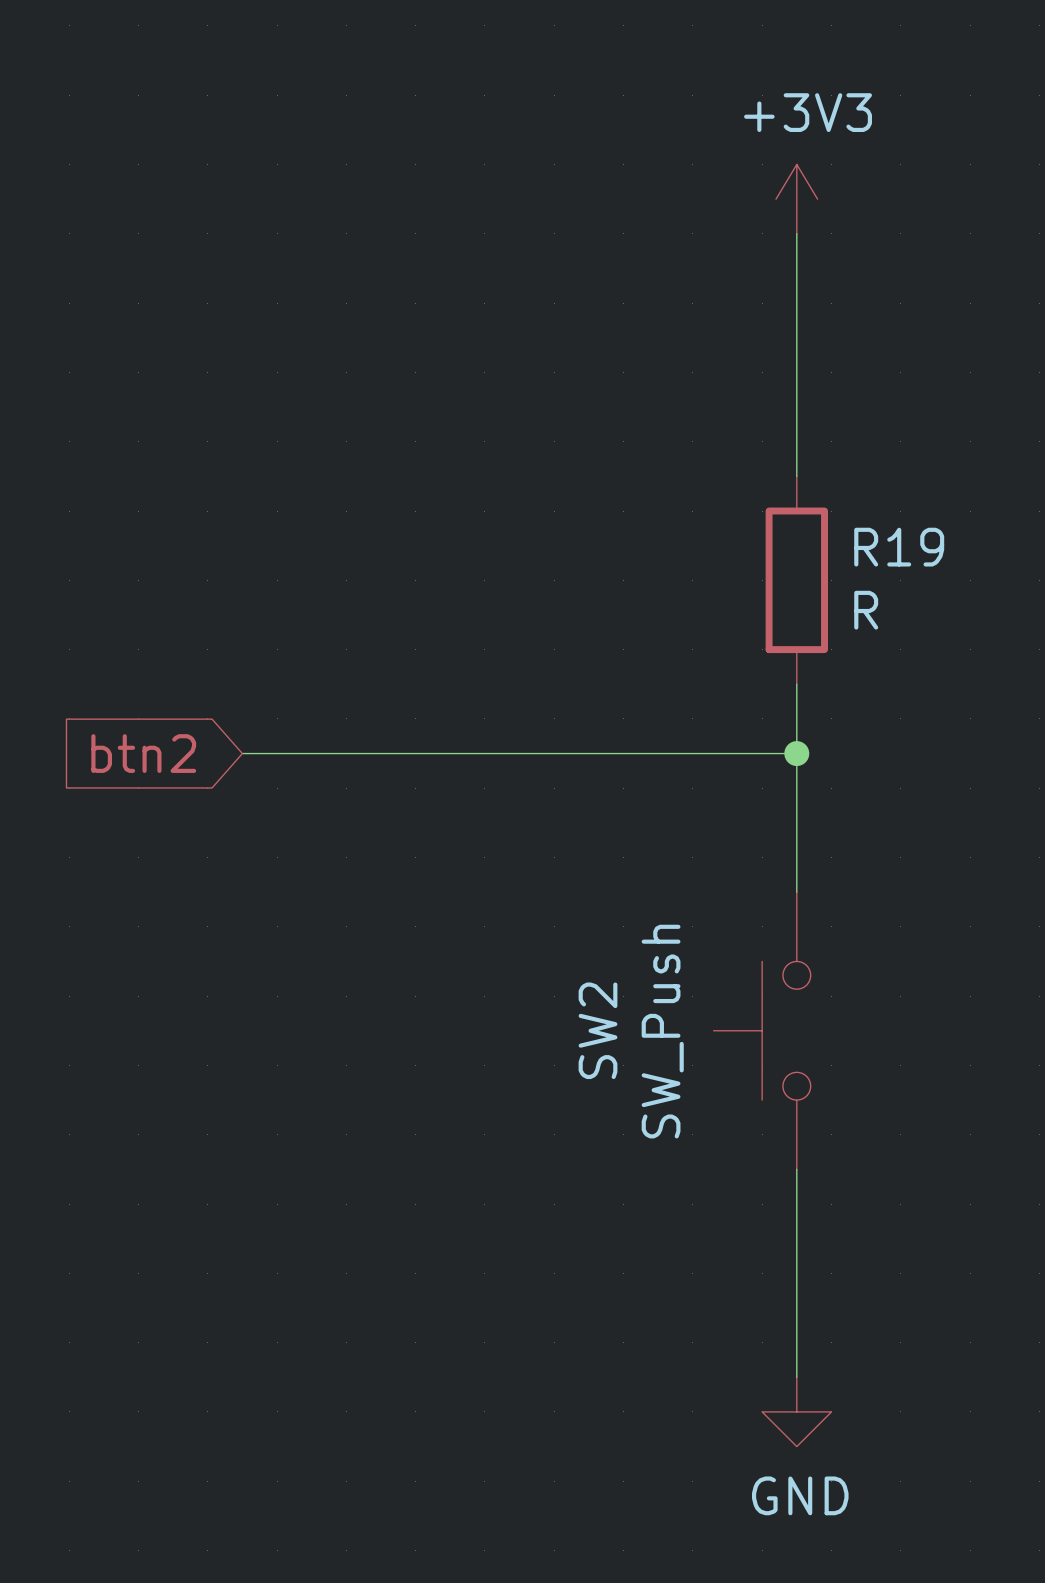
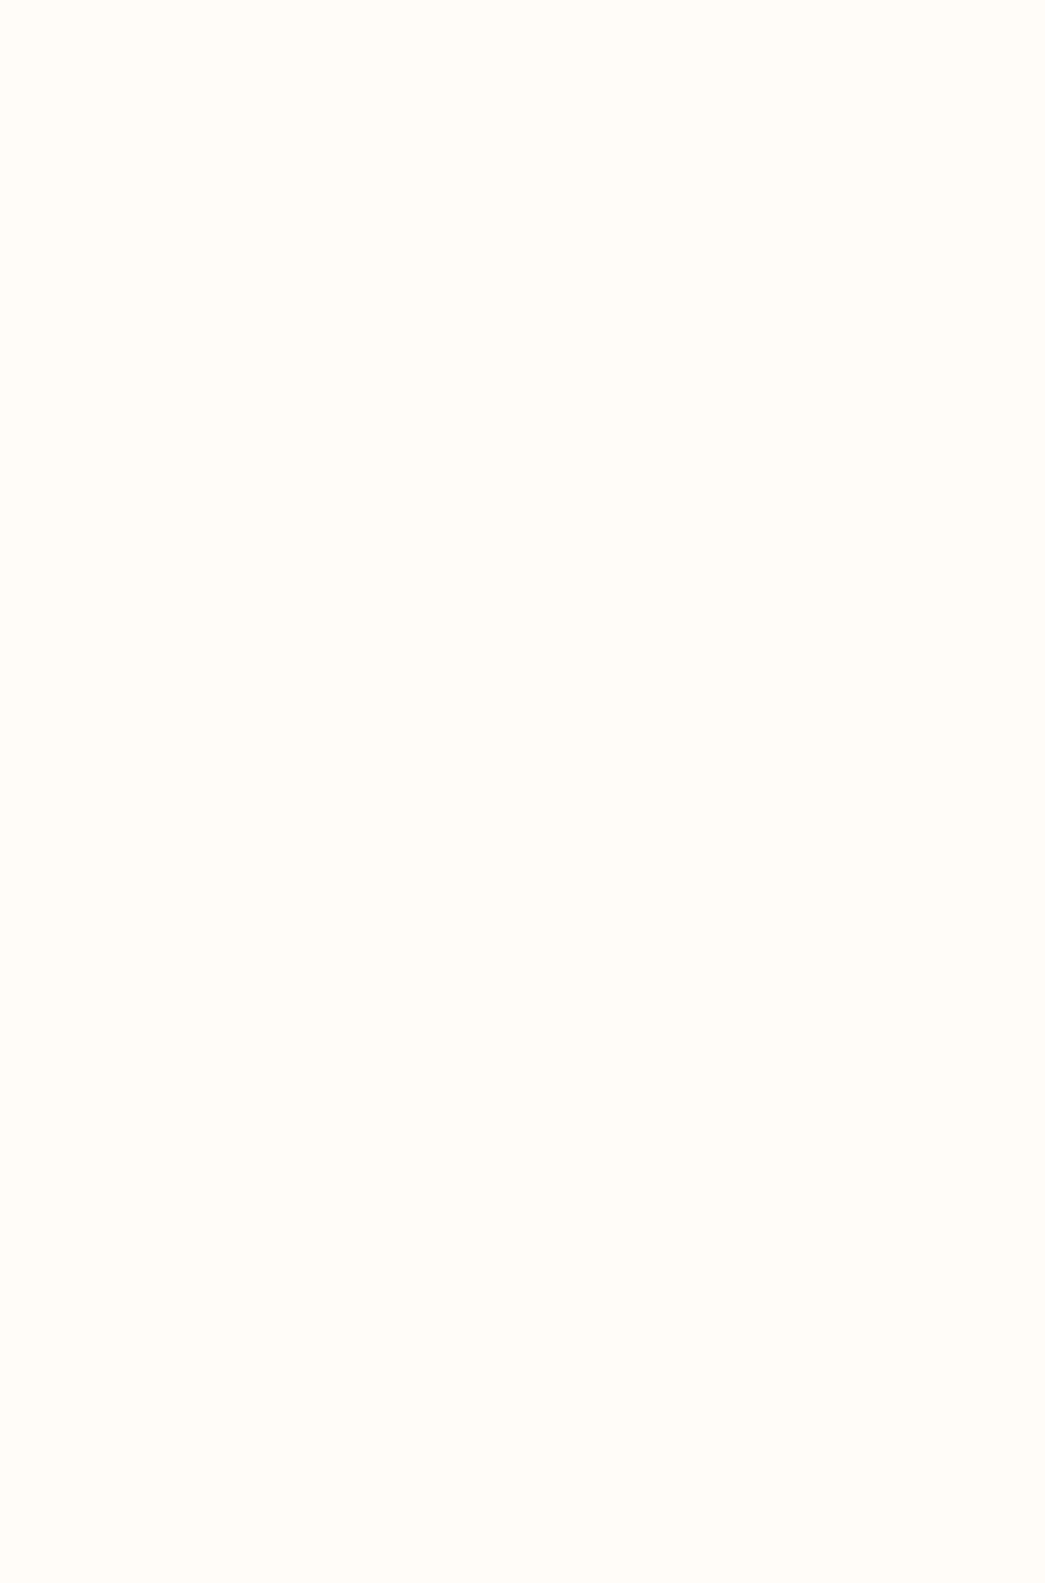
power symbol: +3V3 (796, 199) -> none
wire: (796, 233) (796, 476) -> none
R19: R (796, 580) -> none
wire: (796, 684) (796, 892) -> none
global label: btn2 (143, 753) -> none
wire: (242, 753) (796, 753) -> none
junction: (796, 753) -> none
SW2: SW_Push (762, 1030) -> none
wire: (796, 1169) (796, 1377) -> none
power symbol: GND (796, 1411) -> none

